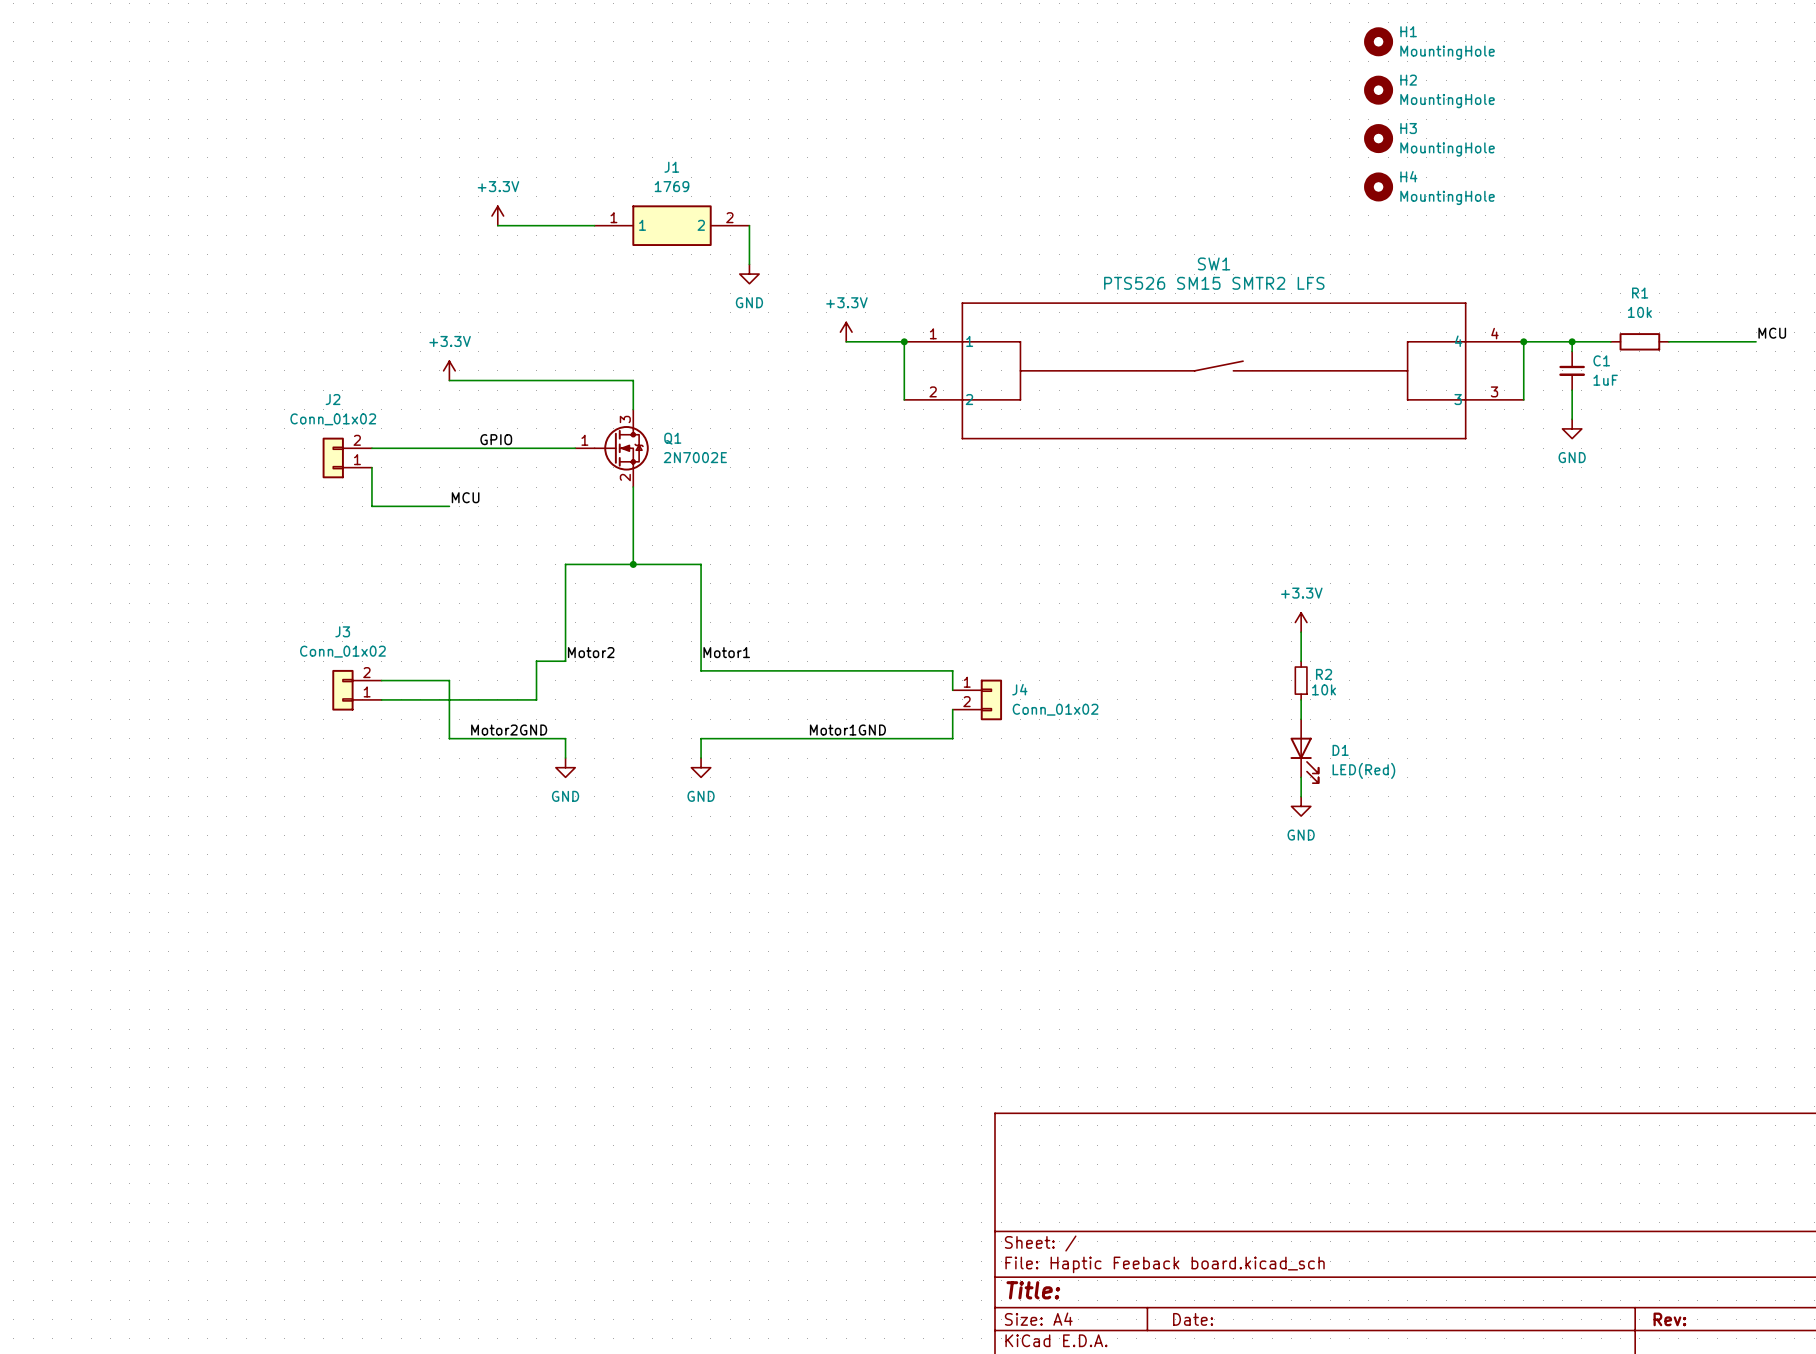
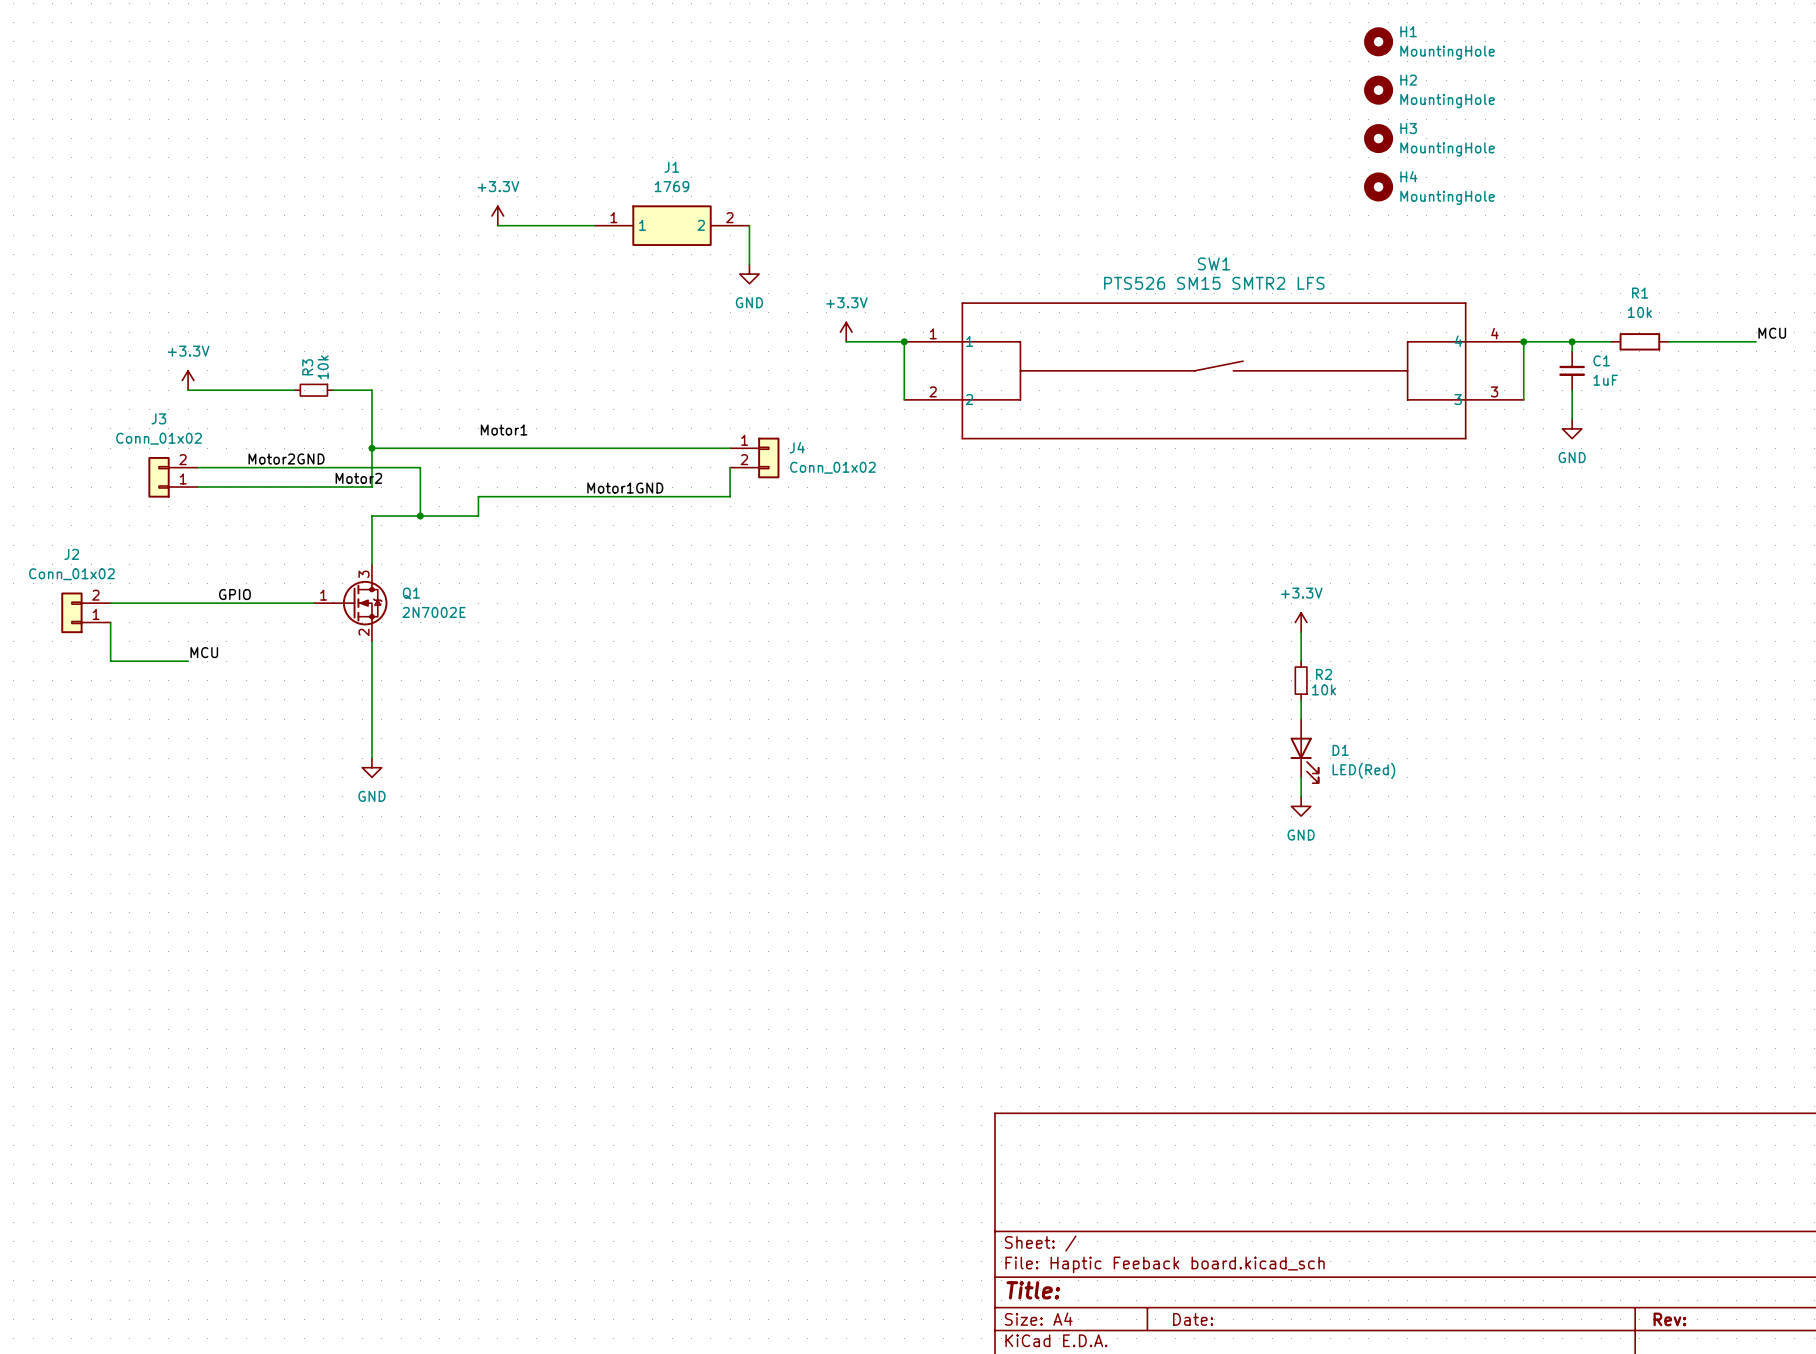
power symbol: +3.3V (449, 370) -> none
power symbol: none -> +3.3V (188, 380)
wire: (449, 380) (633, 380) (633, 409) -> none
wire: none -> (188, 390) (294, 390)
R3: none -> 10k (313, 390)
wire: none -> (333, 390) (371, 390) (371, 467)
label: none -> Motor1 (504, 429)
label: GPIO (496, 439) -> none
junction: none -> (371, 448)
wire: none -> (575, 448) (730, 448)
Q1 position: (612, 448) -> (350, 603)
J2 position: (347, 457) -> (85, 612)
label: none -> Motor2GND (286, 459)
wire: none -> (197, 467) (420, 467) (420, 516)
wire: none -> (730, 467) (730, 496) (478, 496) (478, 516) (371, 516) (371, 564)
label: none -> Motor2 (358, 478)
wire: (371, 487) (371, 506) (449, 506) -> (371, 487) (197, 487)
wire: (633, 487) (633, 564) -> none
label: none -> Motor1GND (625, 488)
label: MCU (465, 497) -> none
junction: none -> (420, 516)
junction: (633, 564) -> none
label: none -> GPIO (234, 594)
wire: none -> (110, 603) (313, 603)
wire: none -> (110, 622) (110, 661) (188, 661)
wire: none -> (371, 641) (371, 758)
label: none -> MCU (204, 652)
label: Motor2 (591, 652) -> none
label: Motor1 (726, 652) -> none
wire: (381, 680) (449, 680) (449, 738) (565, 738) (565, 758) -> none
J3 position: (356, 690) -> (173, 477)
wire: (952, 690) (952, 670) (701, 670) (701, 564) (565, 564) (565, 661) (536, 661) (536, 699) (381, 699) -> none
J4 position: (977, 699) -> (754, 457)
wire: (952, 709) (952, 738) (701, 738) (701, 758) -> none
label: Motor2GND (509, 730) -> none
label: Motor1GND (847, 730) -> none
power symbol: none -> GND (371, 767)
power symbol: GND (565, 767) -> none
power symbol: GND (701, 767) -> none

